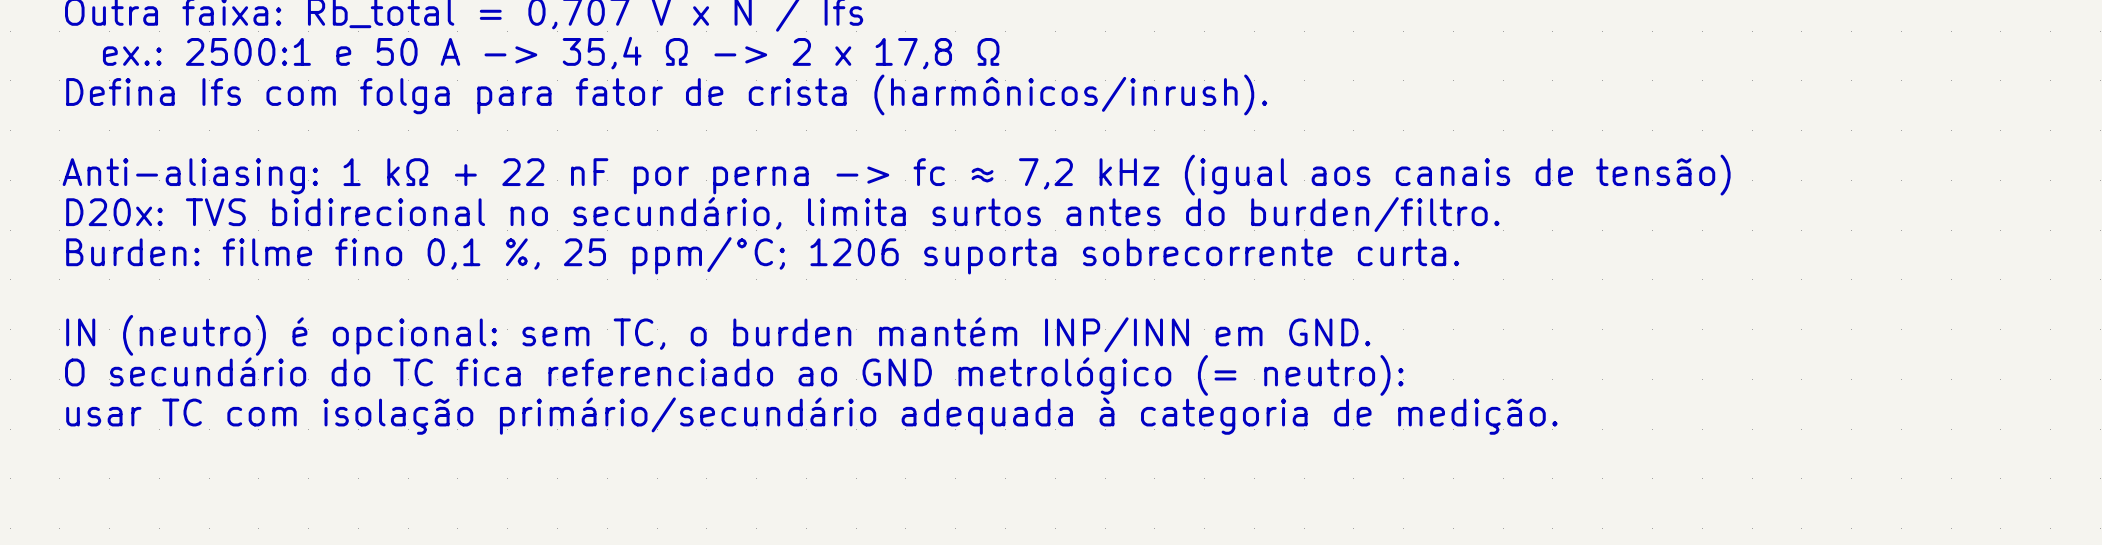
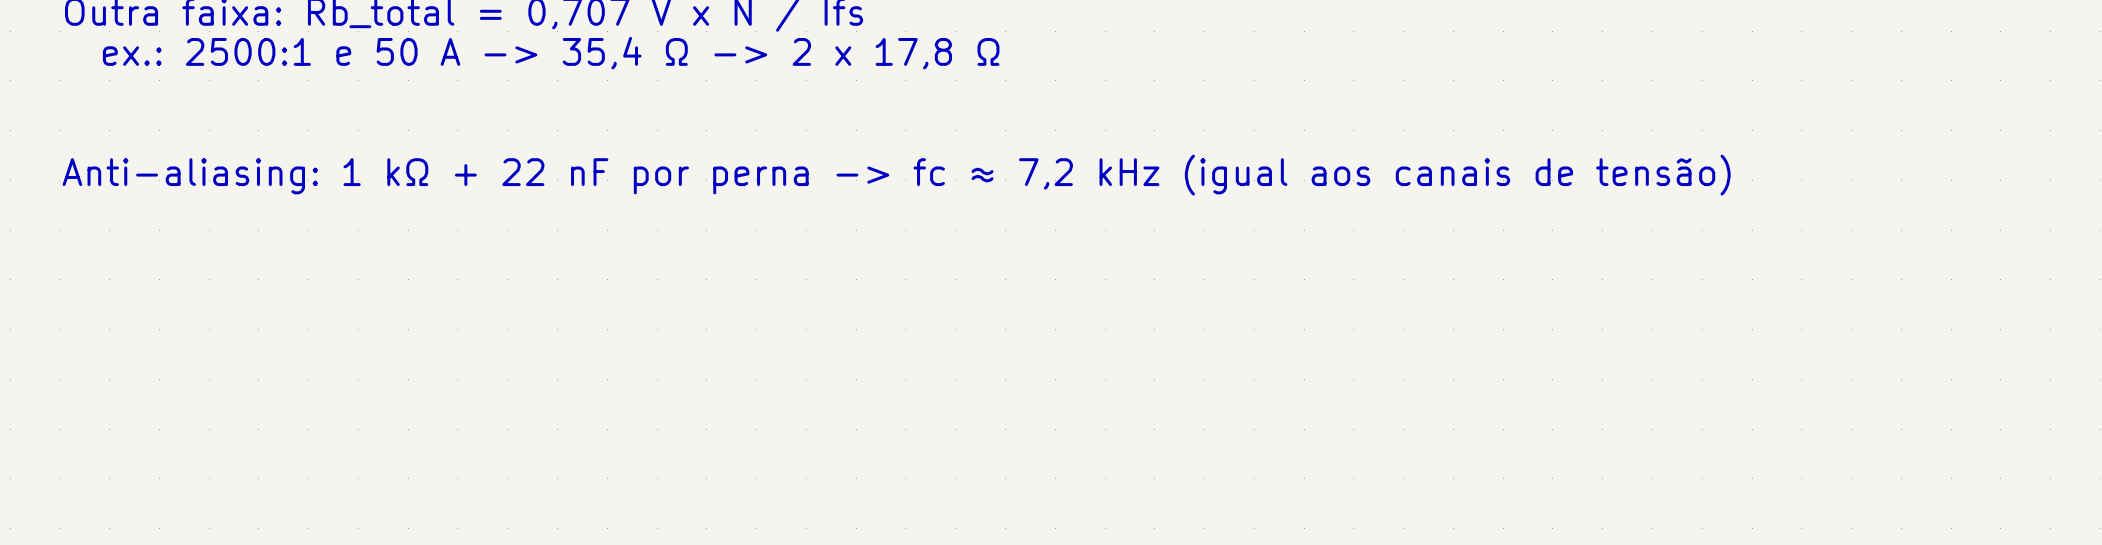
text: Defina Ifs com folga para fator de crista (harmônicos/inrush). (666, 94) -> none
text: D20x: TVS bidirecional no secundário, limita surtos antes do burden/filtro. (782, 214) -> none
text: Burden: filme fino 0,1 %, 25 ppm/°C; 1206 suporta sobrecorrente curta. (762, 255) -> none
text: IN (neutro) é opcional: sem TC, o burden mantém INP/INN em GND. (718, 335) -> none
text: O secundário do TC fica referenciado ao GND metrológico (= neutro): (734, 375) -> none
text: usar TC com isolação primário/secundário adequada à categoria de medição. (811, 416) -> none

